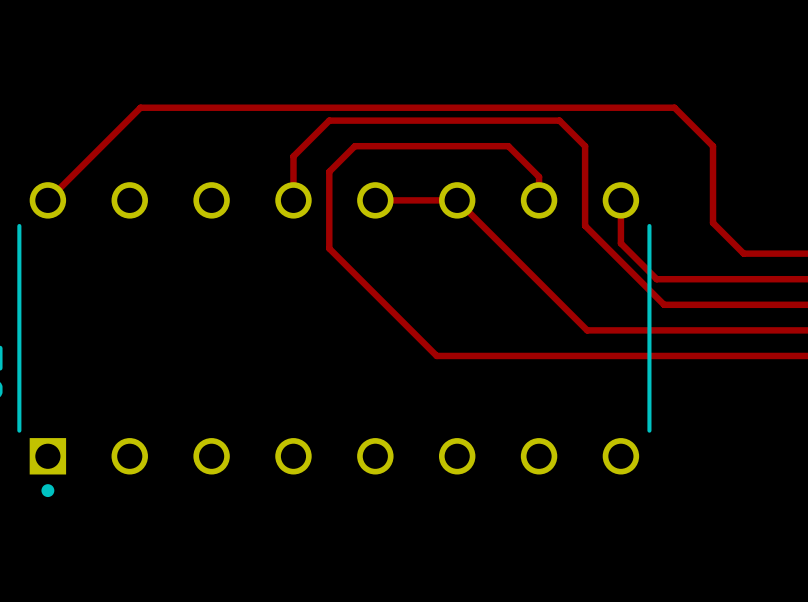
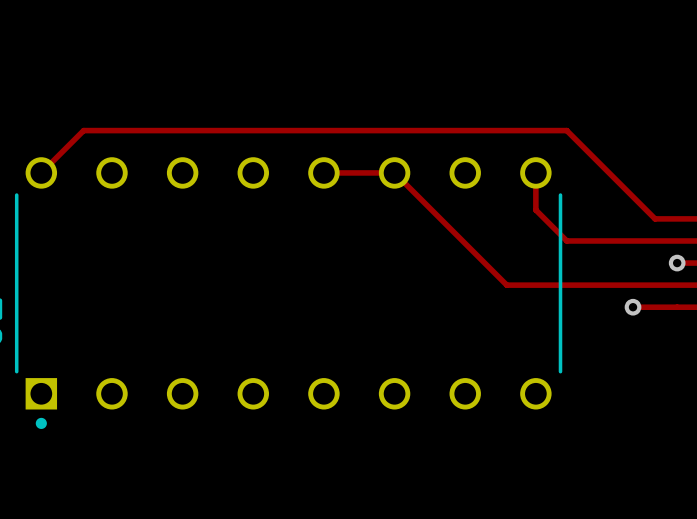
track: (96, 151) (140, 107) (674, 107) (713, 146) (713, 222) (743, 253) (759, 253) -> (83, 130) (566, 130) (655, 218)
track: (293, 200) (293, 156) (329, 120) (559, 120) (585, 146) (585, 225) (664, 304) (784, 304) -> none
track: (539, 200) (539, 176) (508, 146) (354, 146) (329, 171) (329, 248) (436, 355) (733, 355) -> none
via: none -> (677, 263)
via: none -> (633, 307)

